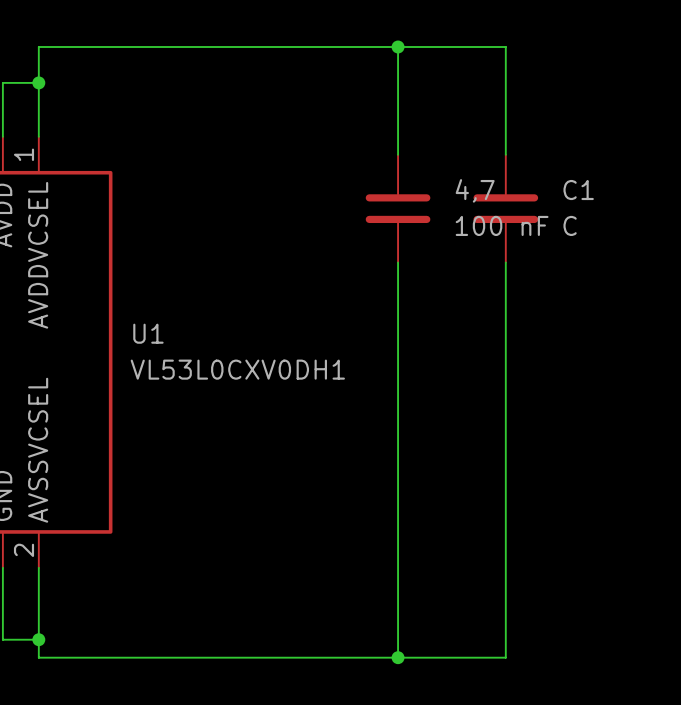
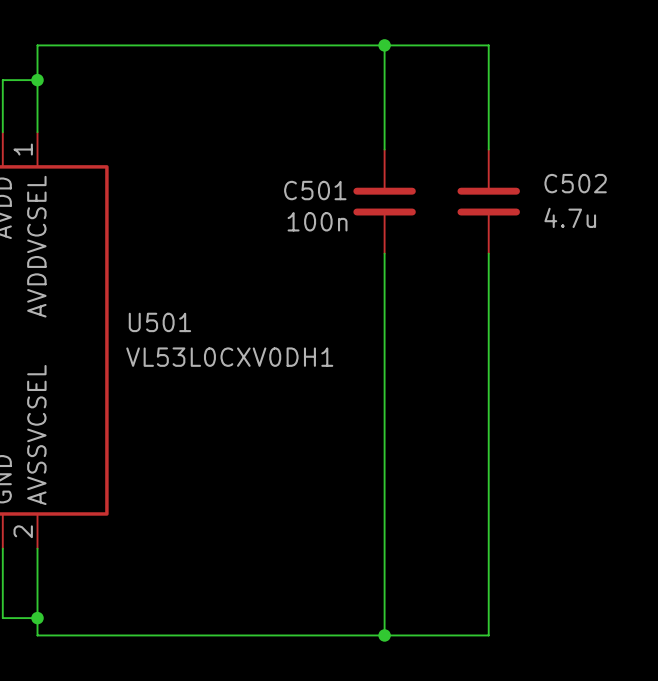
4,7 name: 4,7 (475, 190) -> C501 (315, 190)
C1 name: C1 (578, 190) -> C502 (575, 183)
4,7 value: 100 nF (502, 225) -> 100n (317, 221)
C1 value: C (570, 225) -> 4.7u (570, 217)
U1 name: U1 (148, 333) -> U501 (159, 322)

